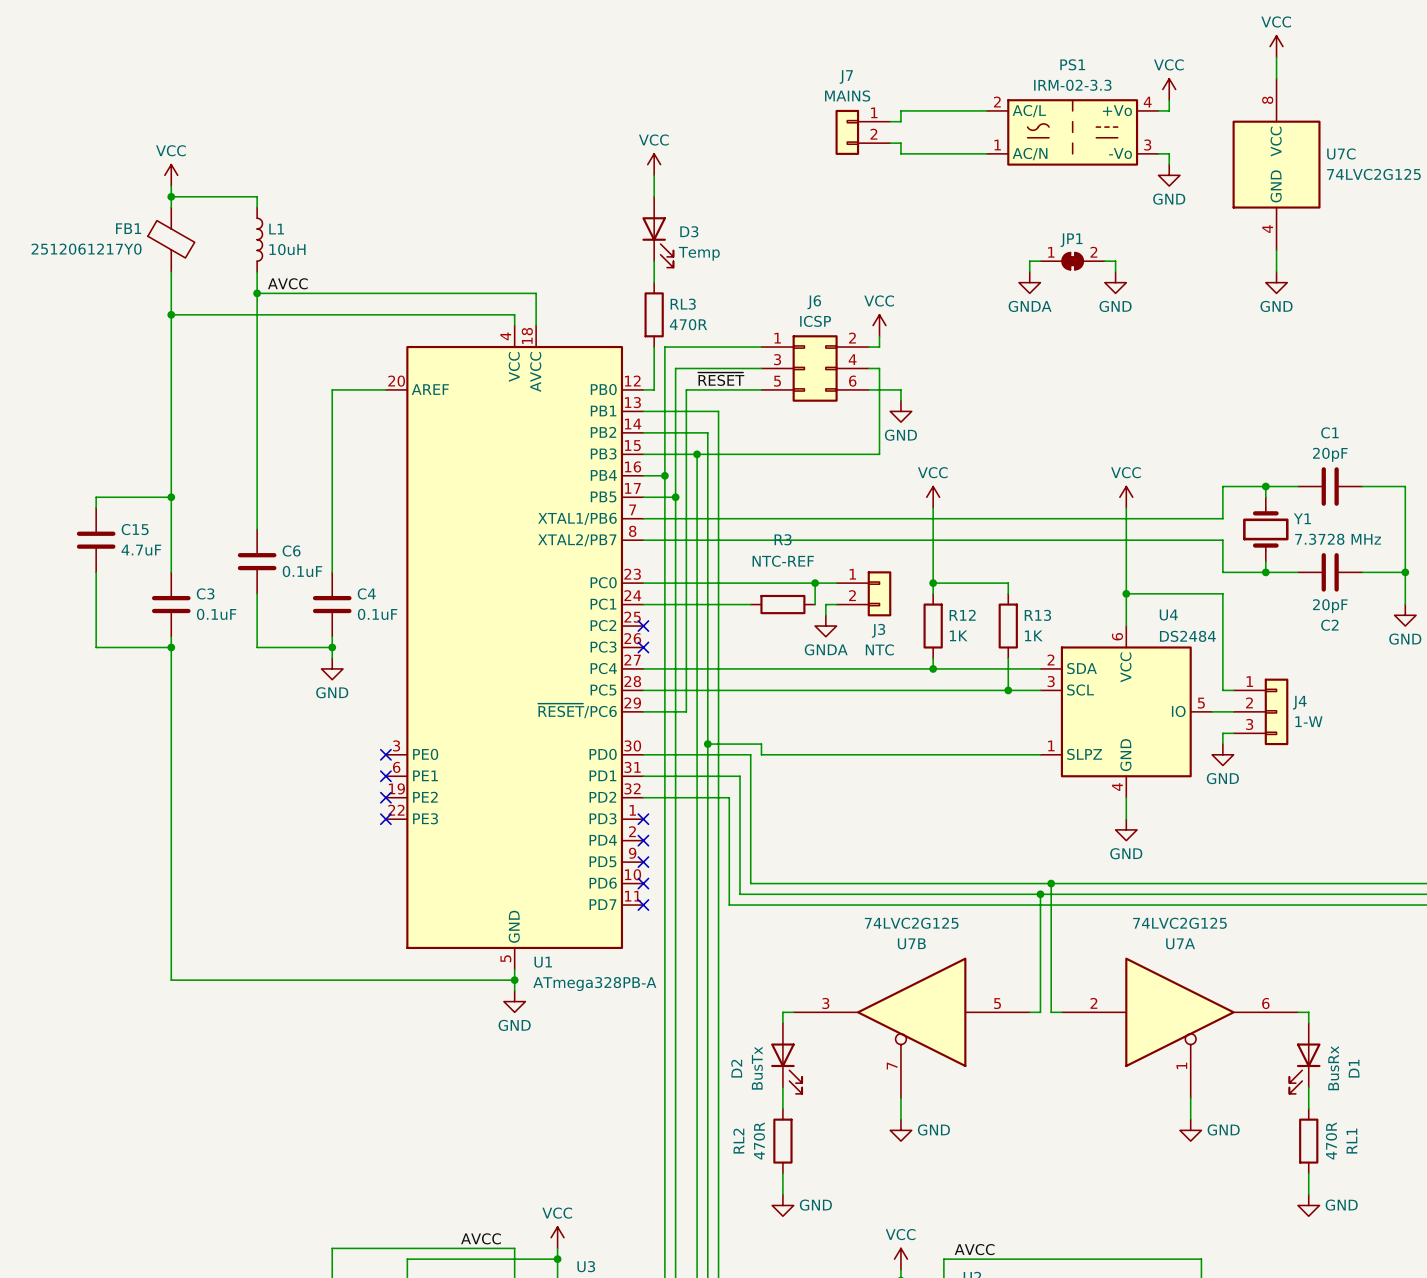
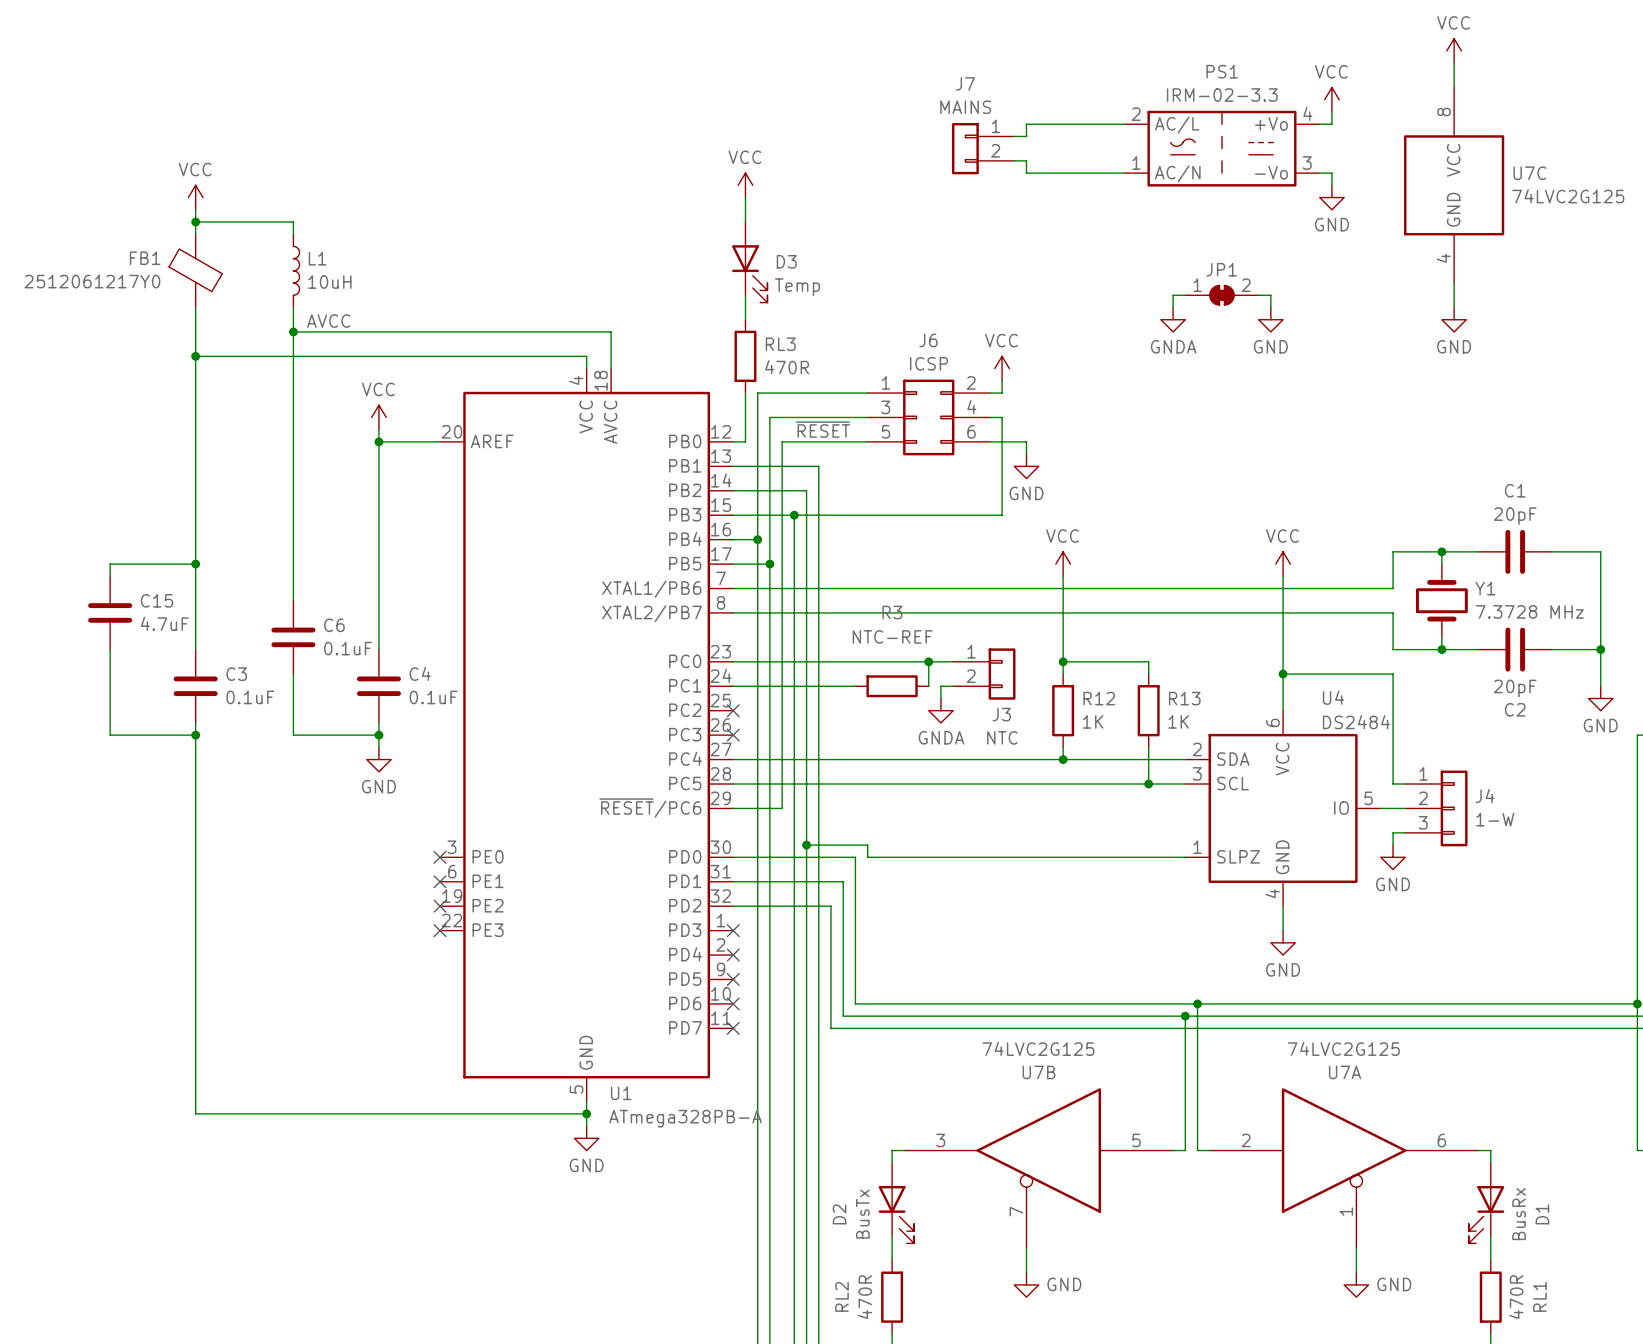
power symbol: none -> VCC (378, 417)
wire: none -> (378, 429) (378, 441)
junction: none -> (378, 441)

